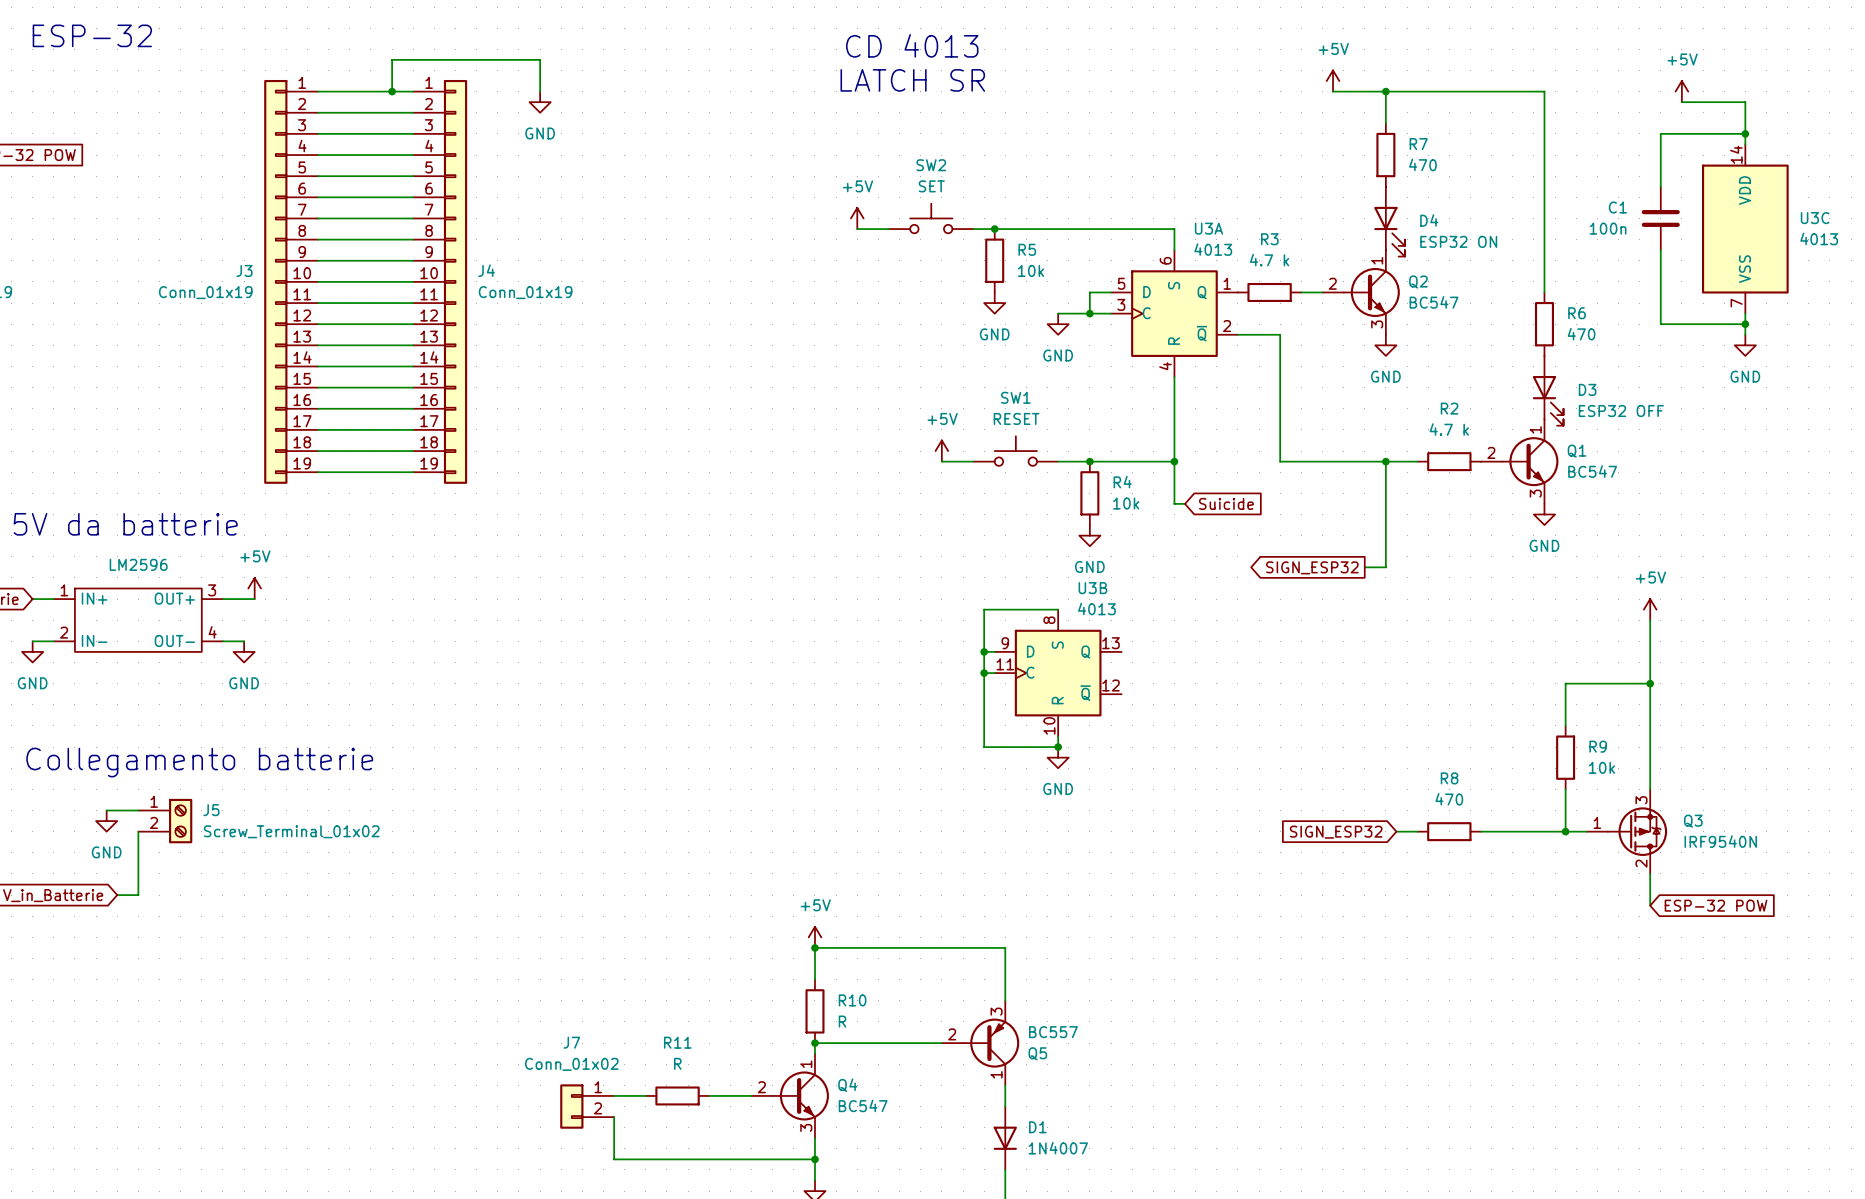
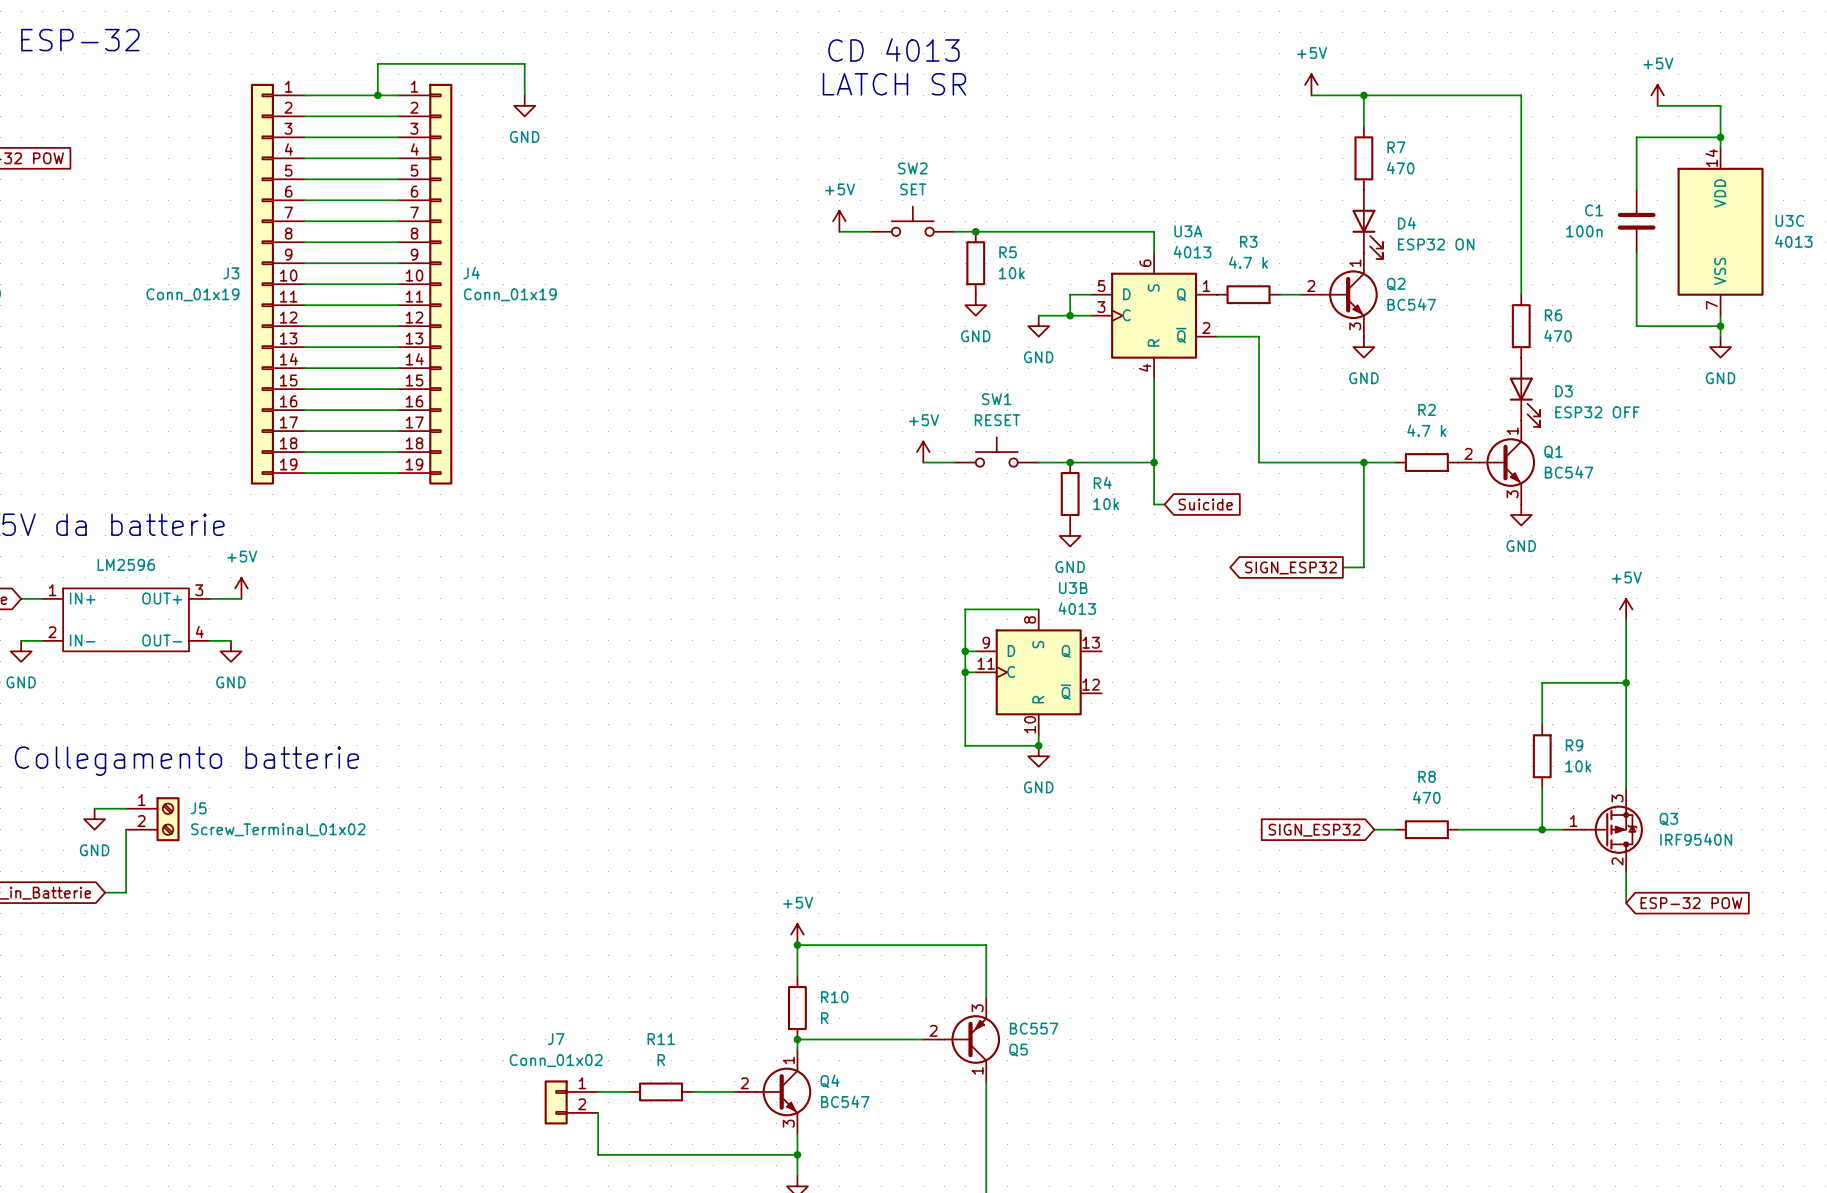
D1: 1N4007 (1005, 1138) -> none

